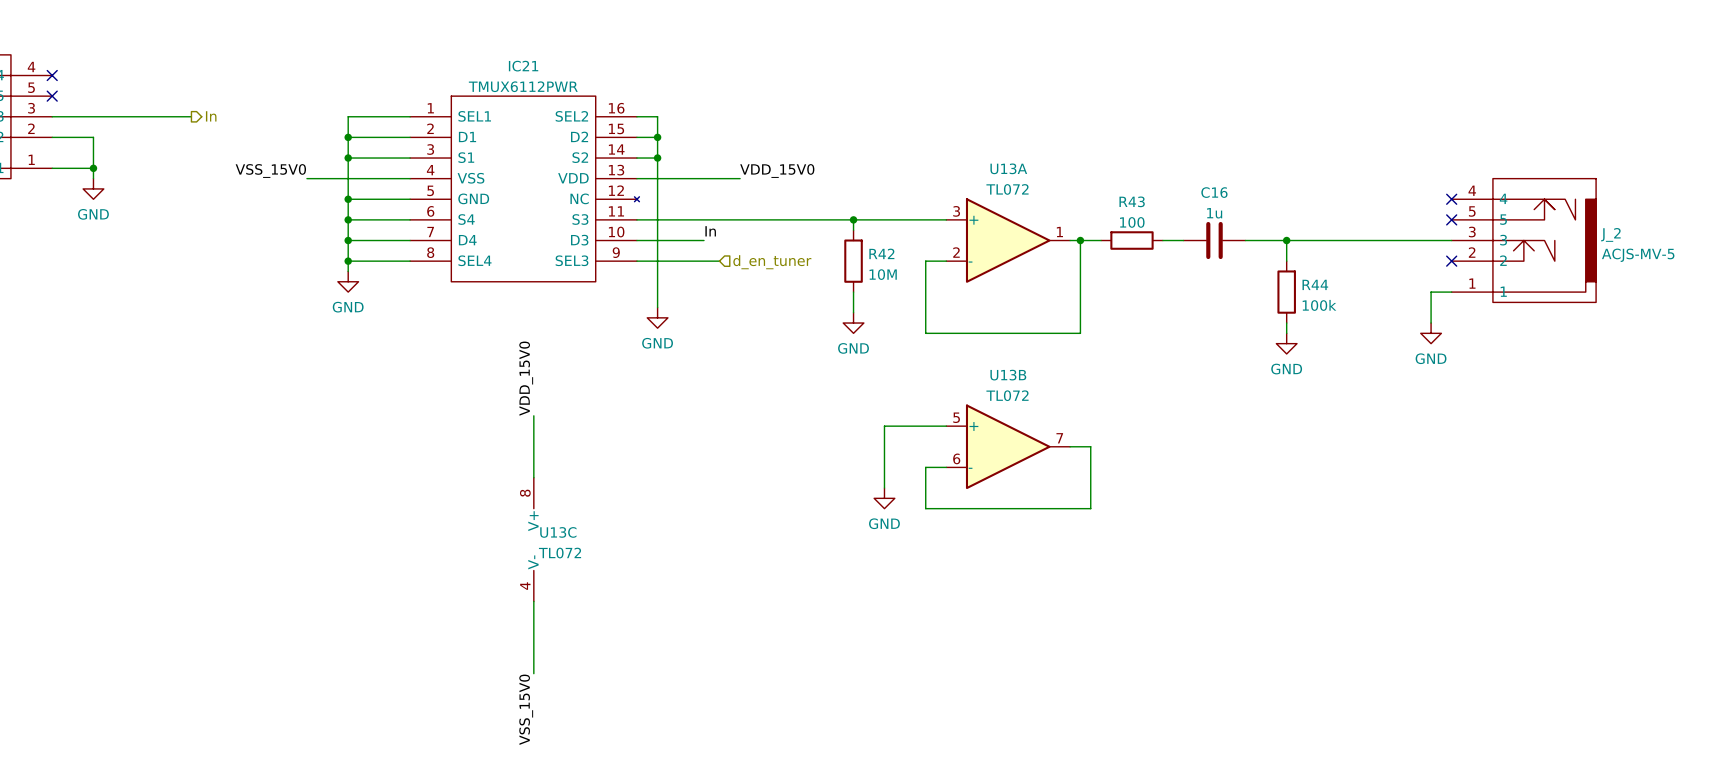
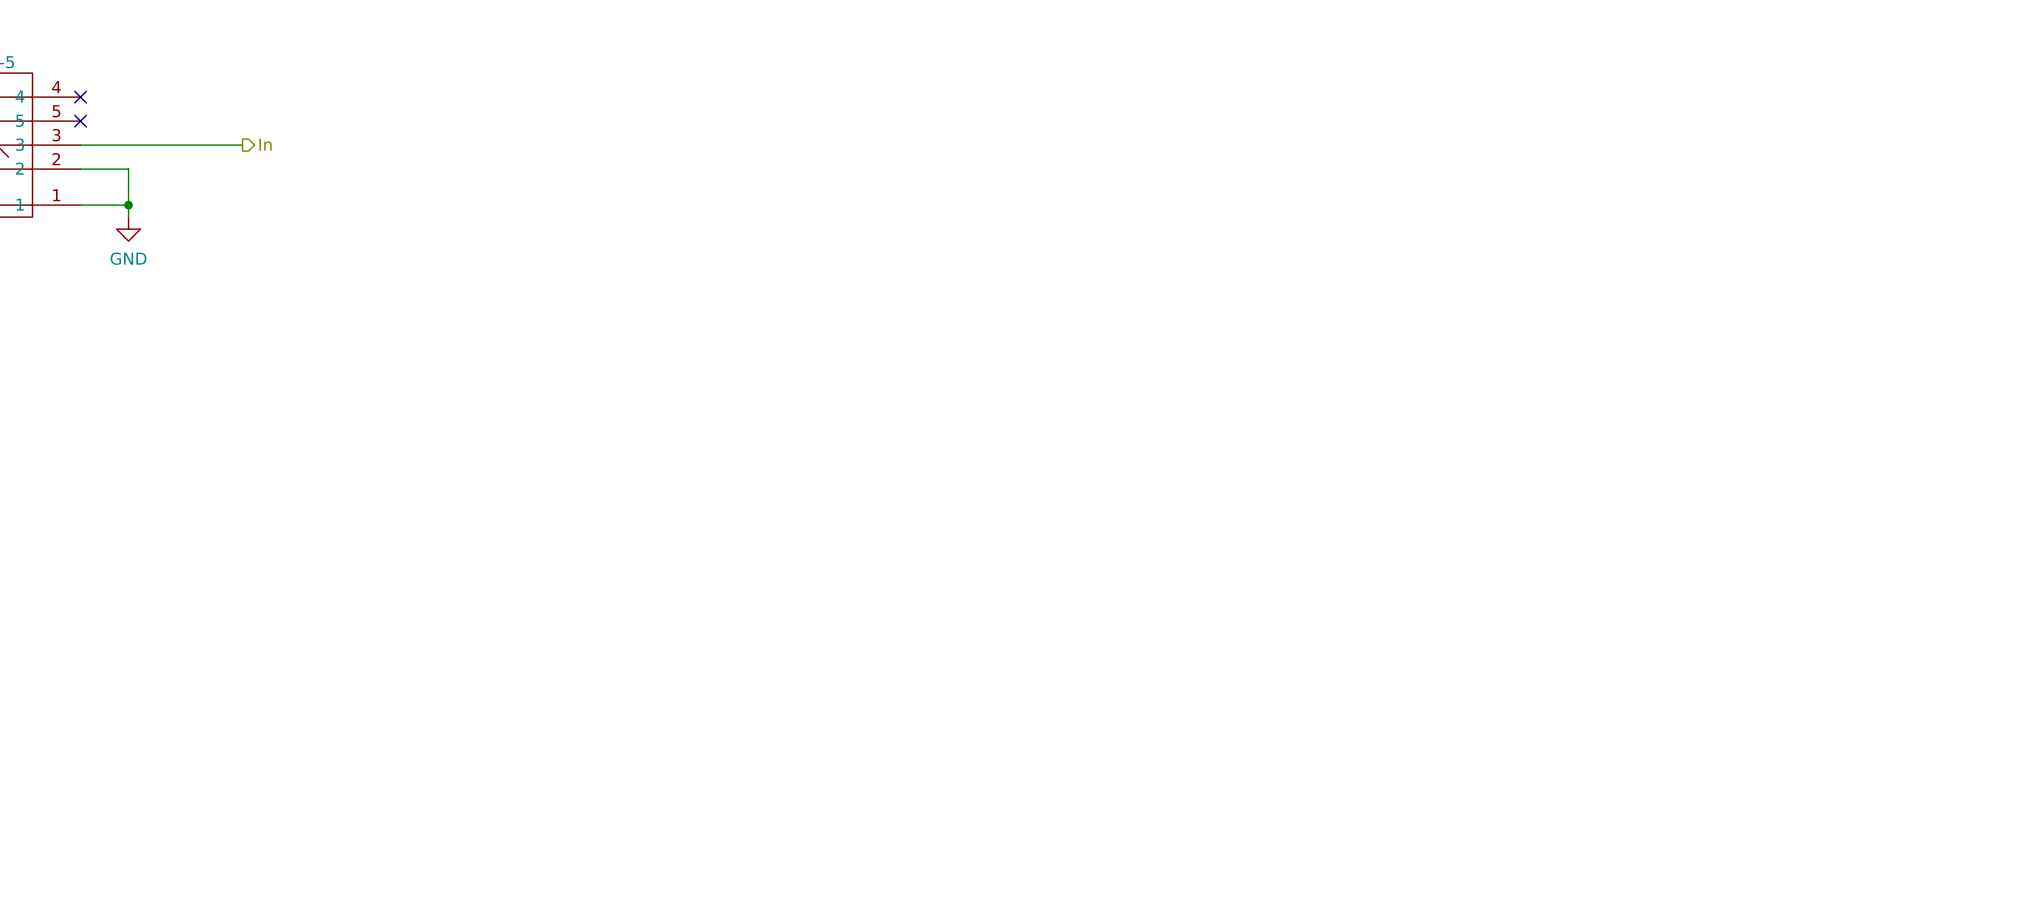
wire: (410, 116) (348, 116) (348, 271) -> none
wire: (636, 116) (657, 116) (657, 307) -> none
wire: (348, 137) (410, 137) -> none
junction: (348, 137) -> none
wire: (636, 137) (657, 137) -> none
junction: (657, 137) -> none
wire: (348, 158) (410, 158) -> none
junction: (348, 158) -> none
wire: (636, 158) (657, 158) -> none
junction: (657, 158) -> none
label: VSS_15V0 (270, 171) -> none
label: VDD_15V0 (777, 171) -> none
wire: (306, 178) (410, 178) -> none
wire: (636, 178) (740, 178) -> none
IC21: TMUX6112PWR (524, 188) -> none
wire: (348, 199) (410, 199) -> none
junction: (348, 199) -> none
no-connect mark: (1451, 199) -> none
wire: (348, 219) (410, 219) -> none
junction: (348, 219) -> none
wire: (636, 219) (946, 219) -> none
wire: (853, 219) (853, 230) -> none
junction: (853, 219) -> none
no-connect mark: (1451, 219) -> none
label: In (710, 231) -> none
wire: (348, 240) (410, 240) -> none
junction: (348, 240) -> none
wire: (636, 240) (704, 240) -> none
U13A: TL072 (1008, 240) -> none
wire: (1070, 240) (1101, 240) -> none
wire: (1080, 240) (1080, 333) (925, 333) (925, 261) (946, 261) -> none
junction: (1080, 240) -> none
R43: 100 (1131, 240) -> none
wire: (1162, 240) (1183, 240) -> none
C16: 1u (1214, 240) -> none
wire: (1245, 240) (1451, 240) -> none
wire: (1286, 240) (1286, 261) -> none
junction: (1286, 240) -> none
J_2: ACJS-MV-5 (1524, 240) -> none
wire: (348, 261) (410, 261) -> none
junction: (348, 261) -> none
wire: (636, 261) (719, 261) -> none
R42: 10M (853, 261) -> none
no-connect mark: (1451, 261) -> none
hierarchical label: d_en_tuner (772, 262) -> none
power symbol: GND (348, 281) -> none
wire: (853, 292) (853, 312) -> none
R44: 100k (1286, 292) -> none
wire: (1451, 292) (1431, 292) (1431, 323) -> none
power symbol: GND (657, 317) -> none
power symbol: GND (853, 323) -> none
wire: (1286, 323) (1286, 333) -> none
power symbol: GND (1431, 333) -> none
power symbol: GND (1286, 343) -> none
label: VDD_15V0 (526, 378) -> none
wire: (533, 415) (533, 477) -> none
wire: (946, 426) (884, 426) (884, 488) -> none
U13B: TL072 (1008, 446) -> none
wire: (1070, 446) (1090, 446) (1090, 508) (925, 508) (925, 467) (946, 467) -> none
power symbol: GND (884, 498) -> none
U13C: TL072 (533, 539) -> none
wire: (533, 601) (533, 673) -> none
label: VSS_15V0 (526, 709) -> none

